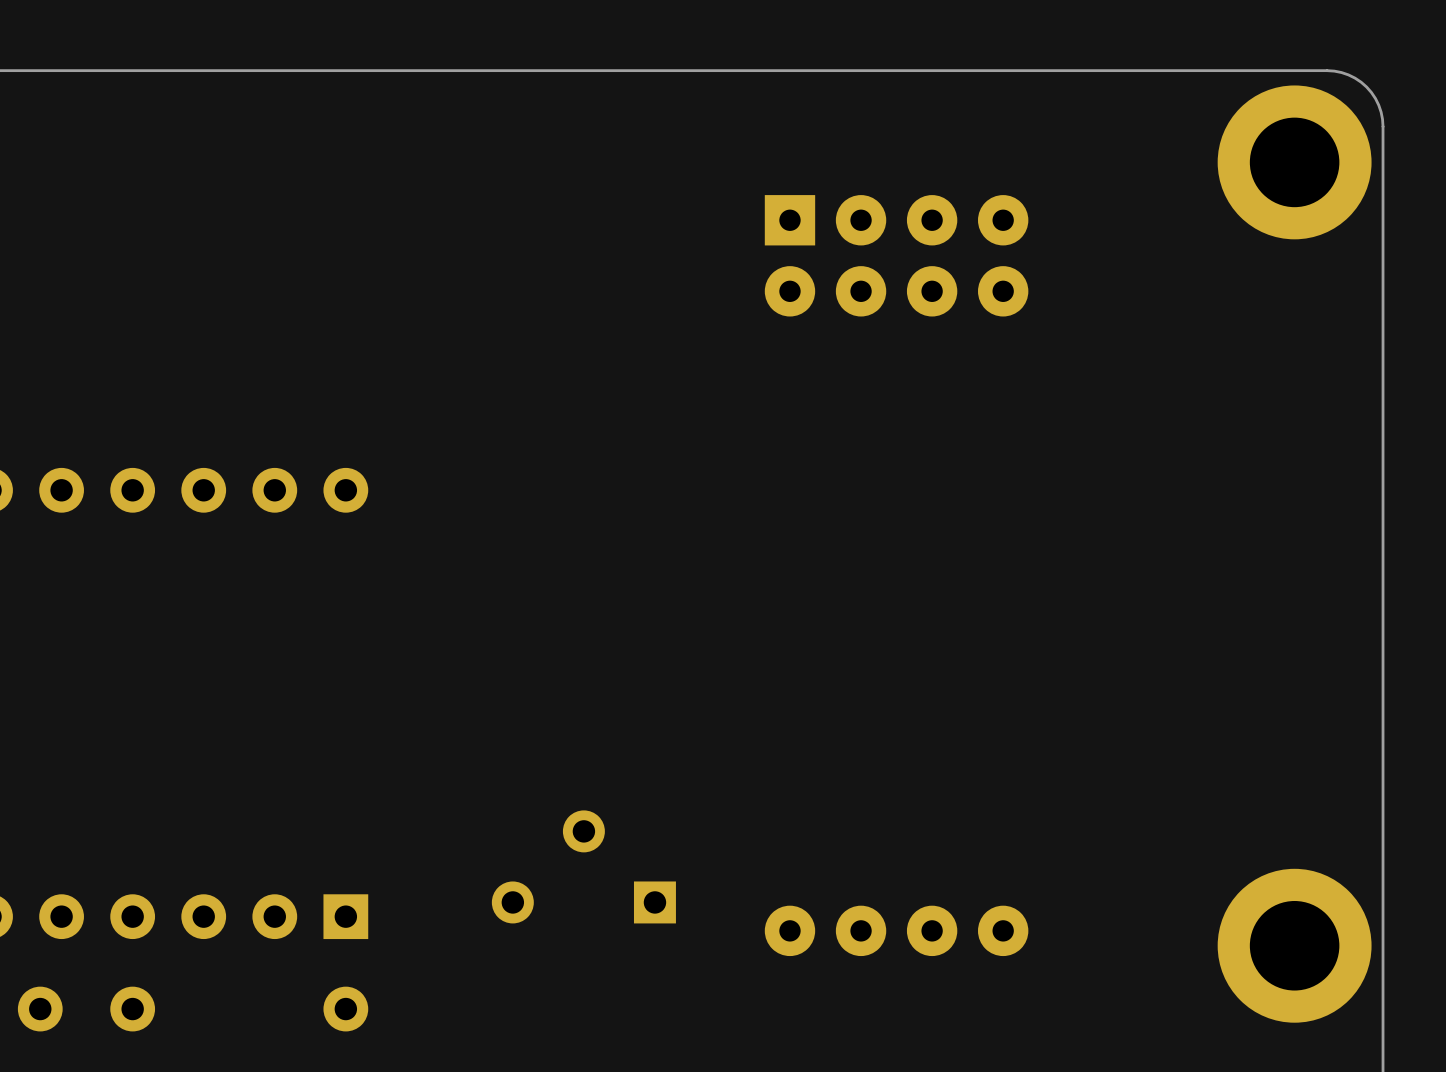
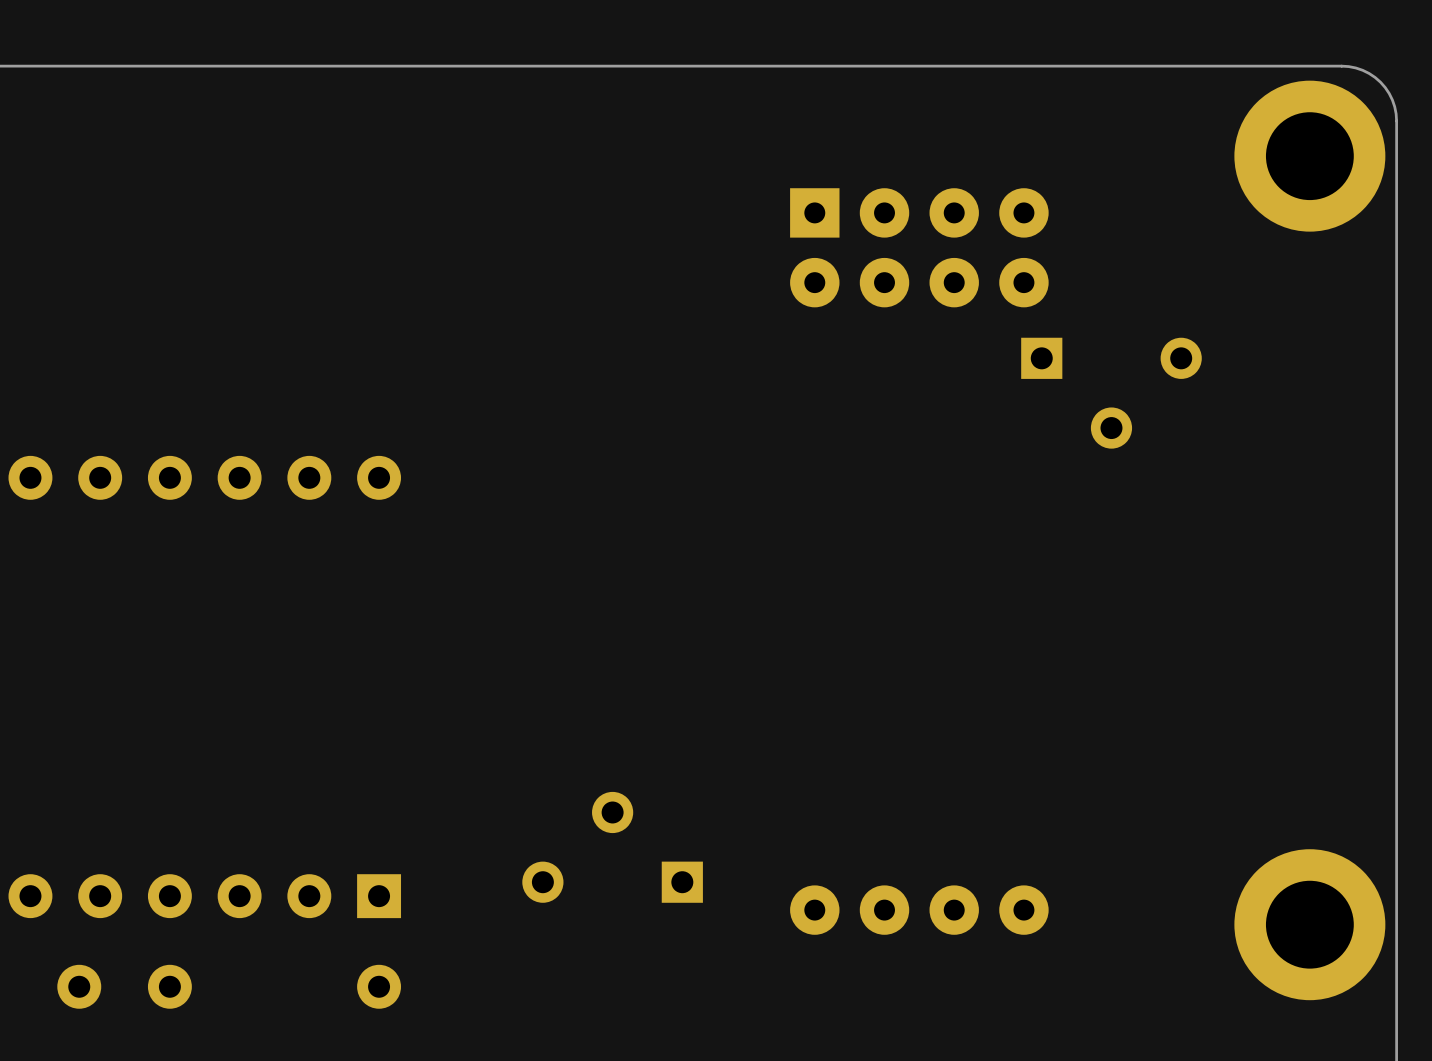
part: none -> (1111, 393)

